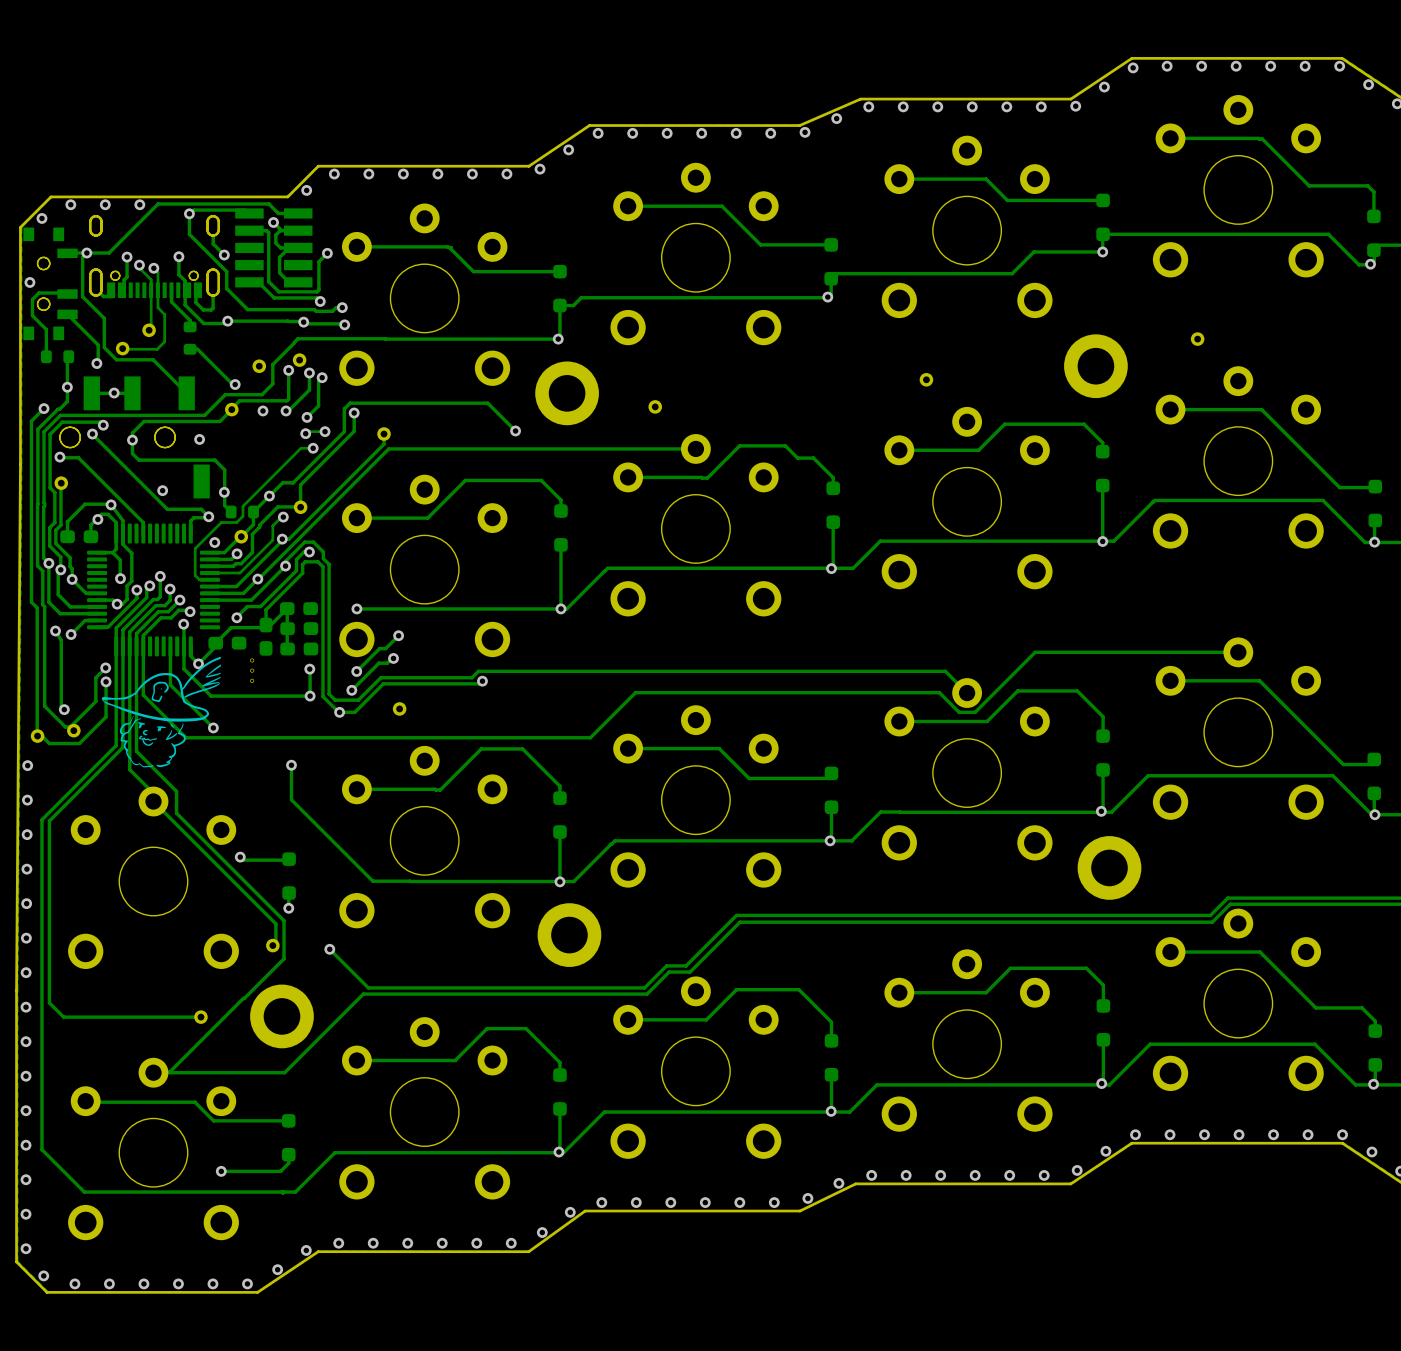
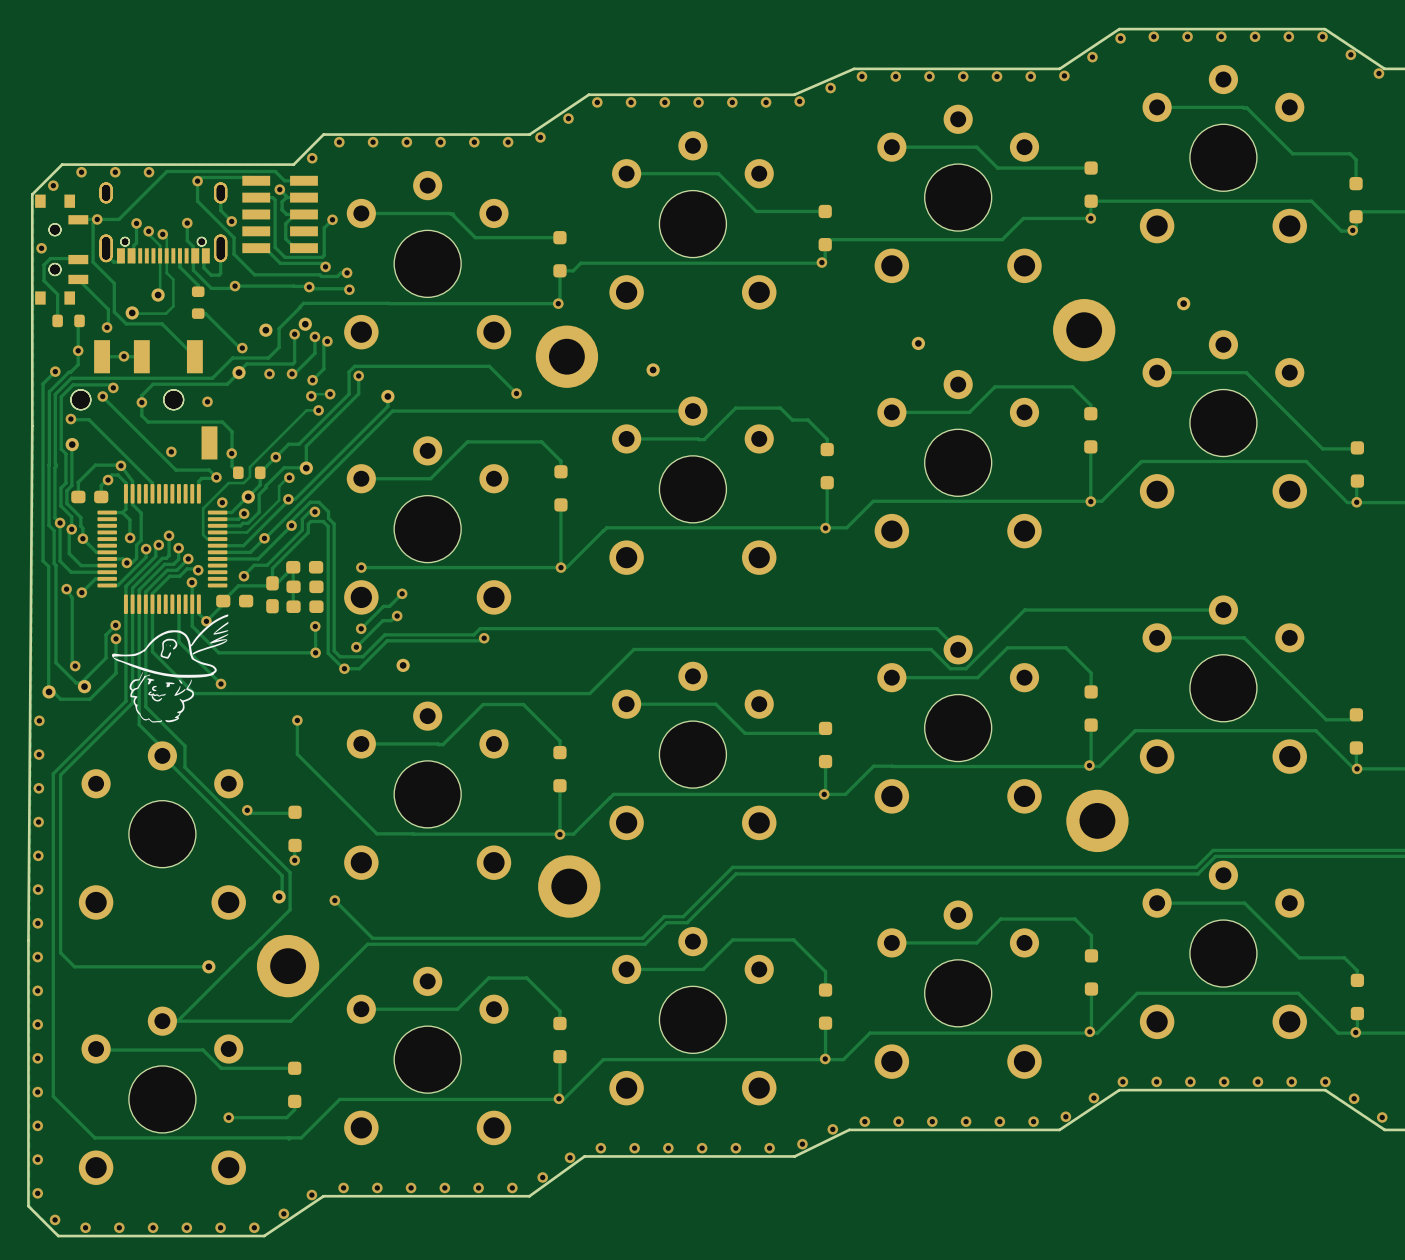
part: (252, 670) -> none

